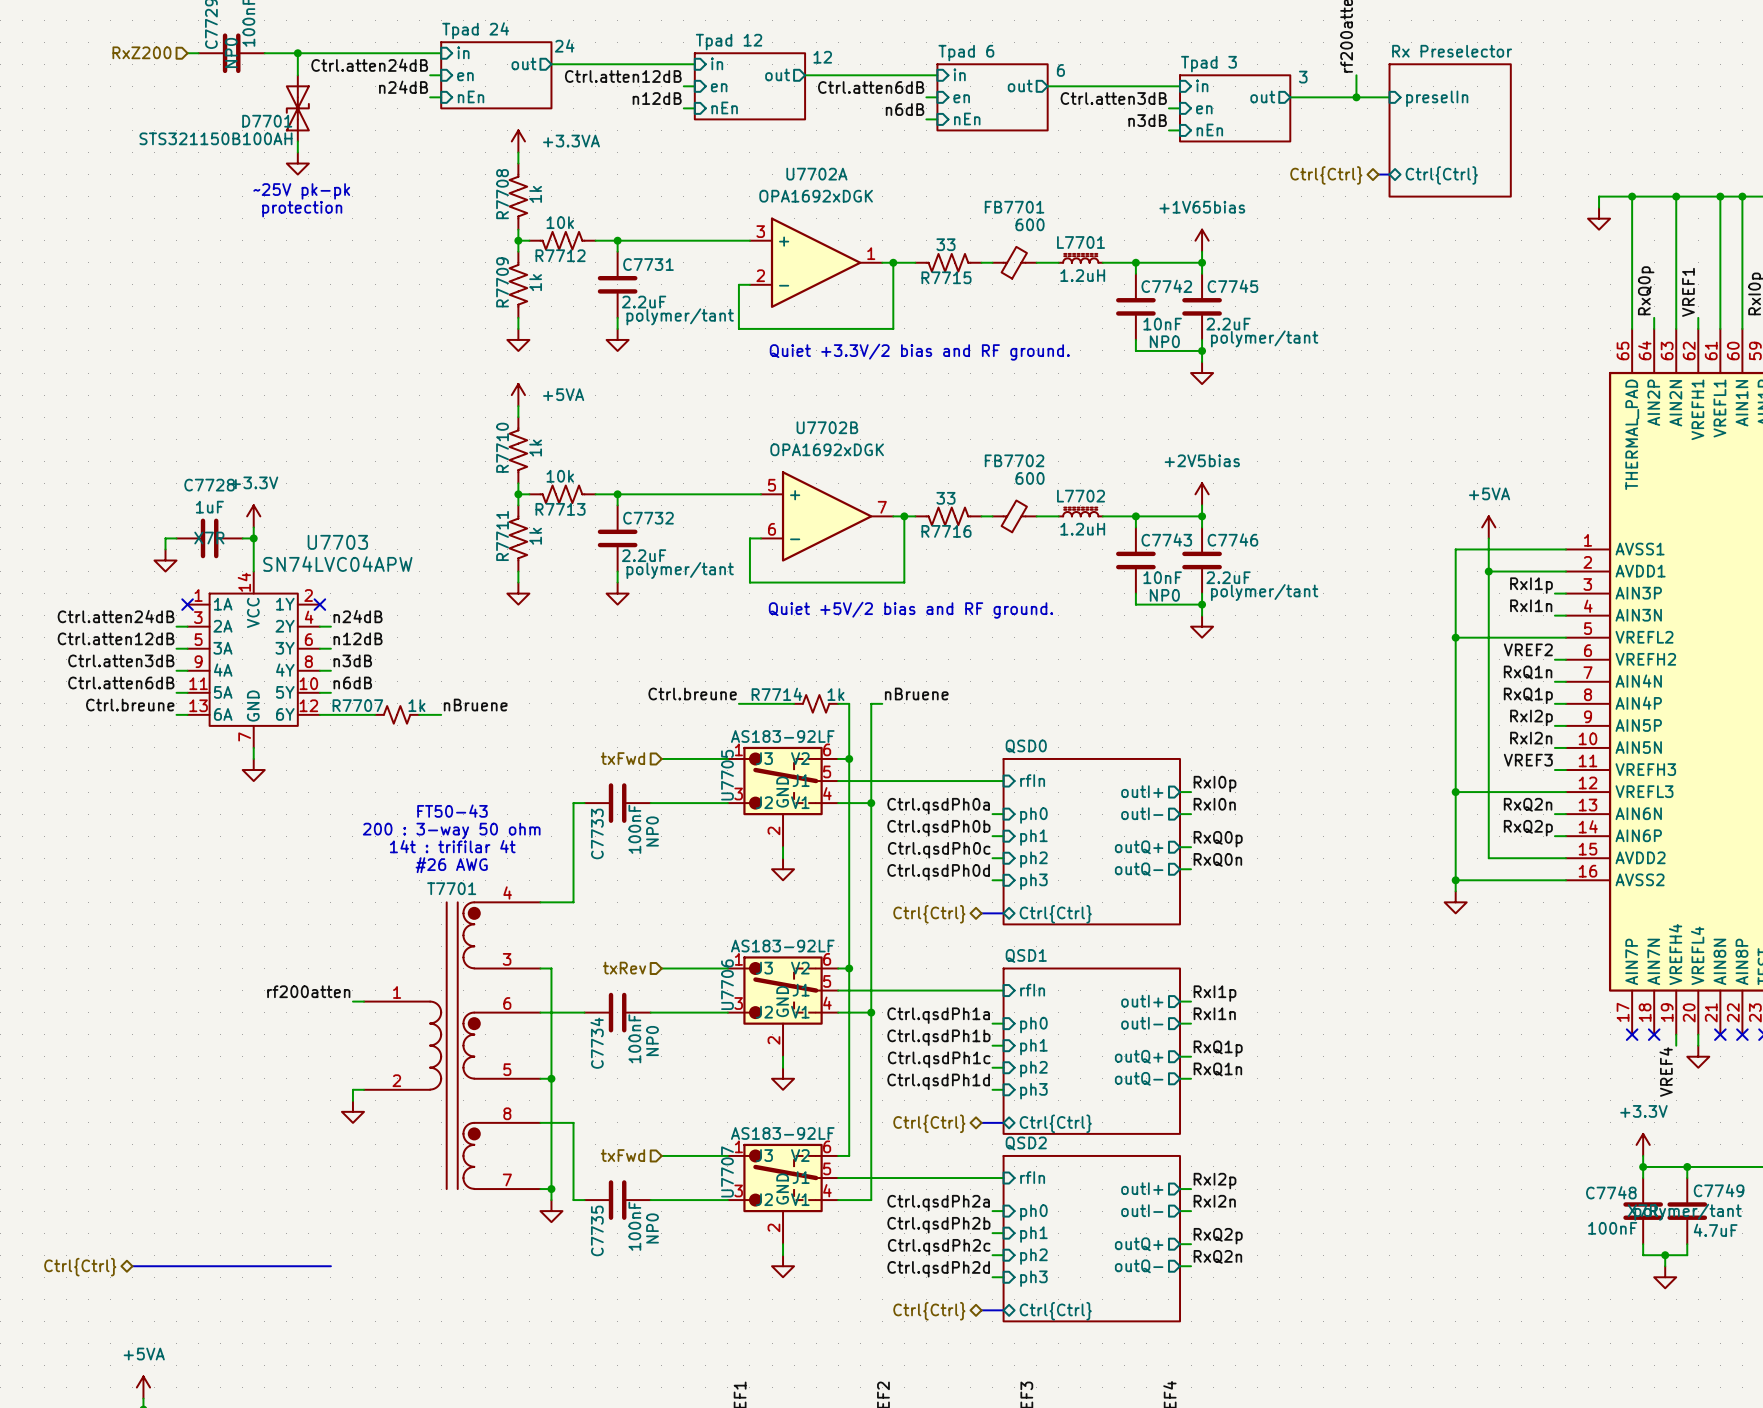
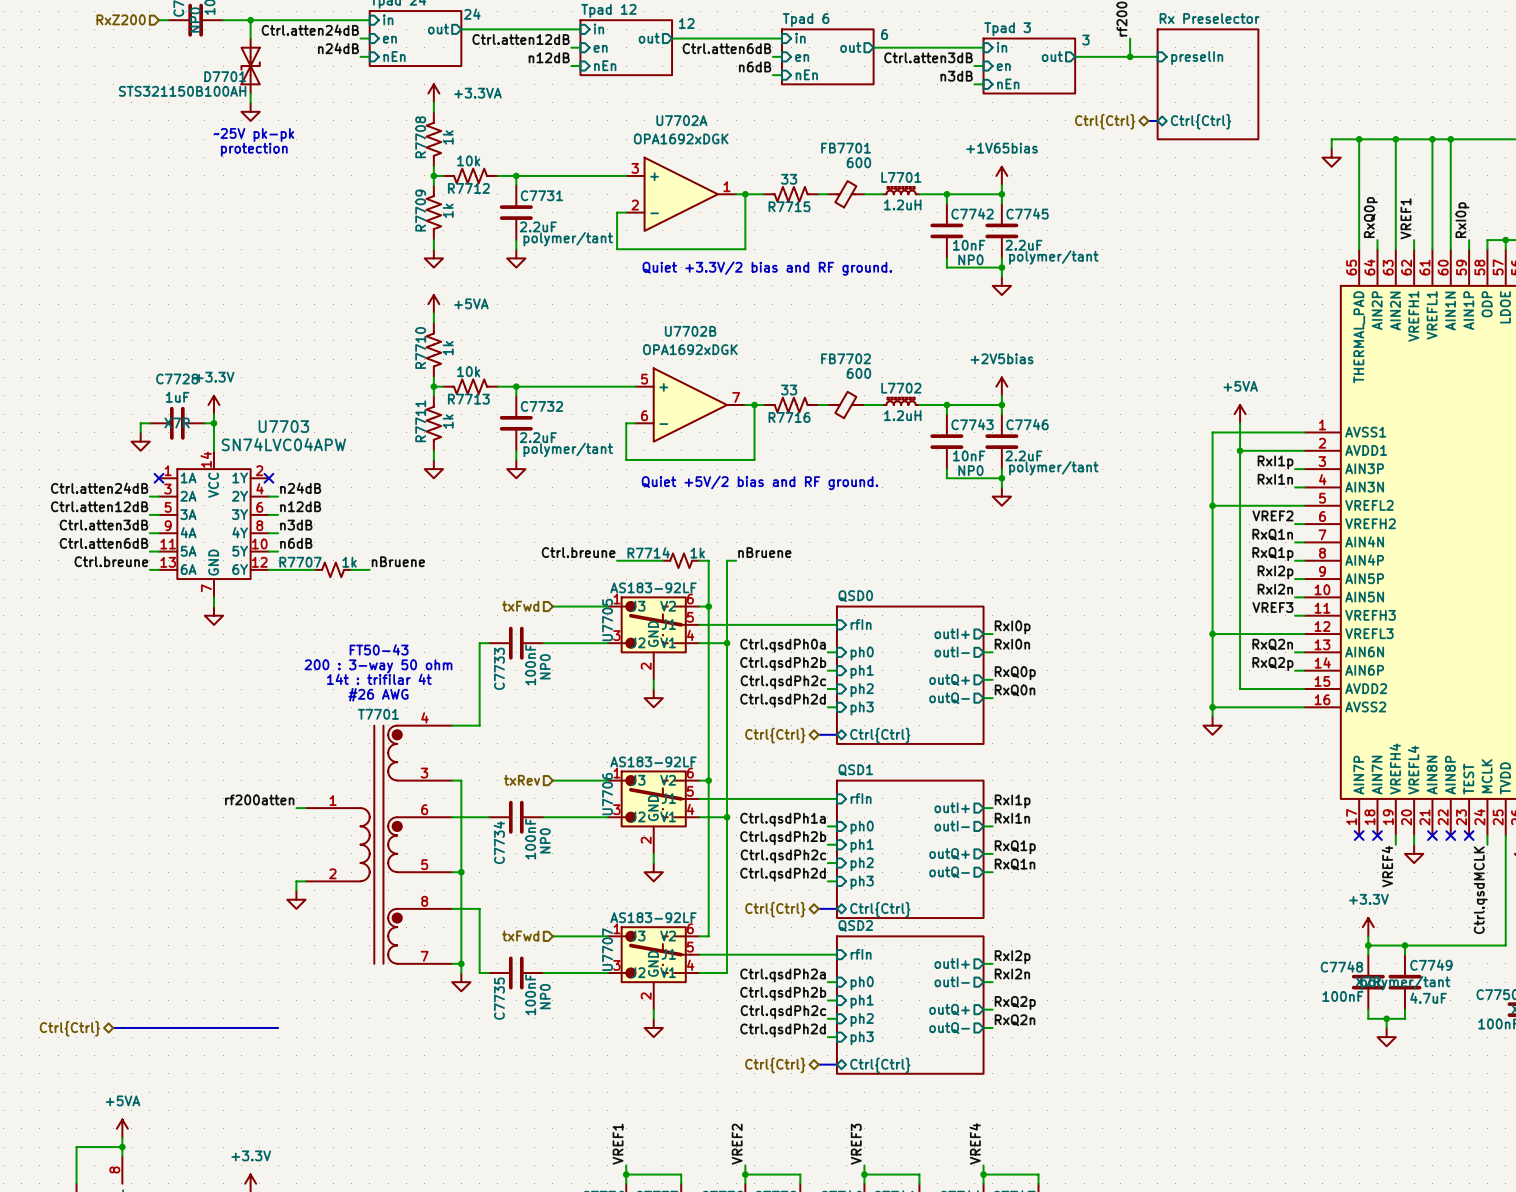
label: Ctrl.qsdPh0b (938, 828) -> Ctrl.qsdPh2b (783, 664)
label: Ctrl.qsdPh0c (939, 850) -> Ctrl.qsdPh2c (783, 682)
label: Ctrl.qsdPh0d (938, 872) -> Ctrl.qsdPh2d (783, 700)
label: Ctrl.qsdPh1b (938, 1037) -> Ctrl.qsdPh2b (783, 838)
label: Ctrl.qsdPh1c (939, 1059) -> Ctrl.qsdPh2c (783, 856)
label: Ctrl.qsdPh1d (938, 1081) -> Ctrl.qsdPh2d (783, 874)

